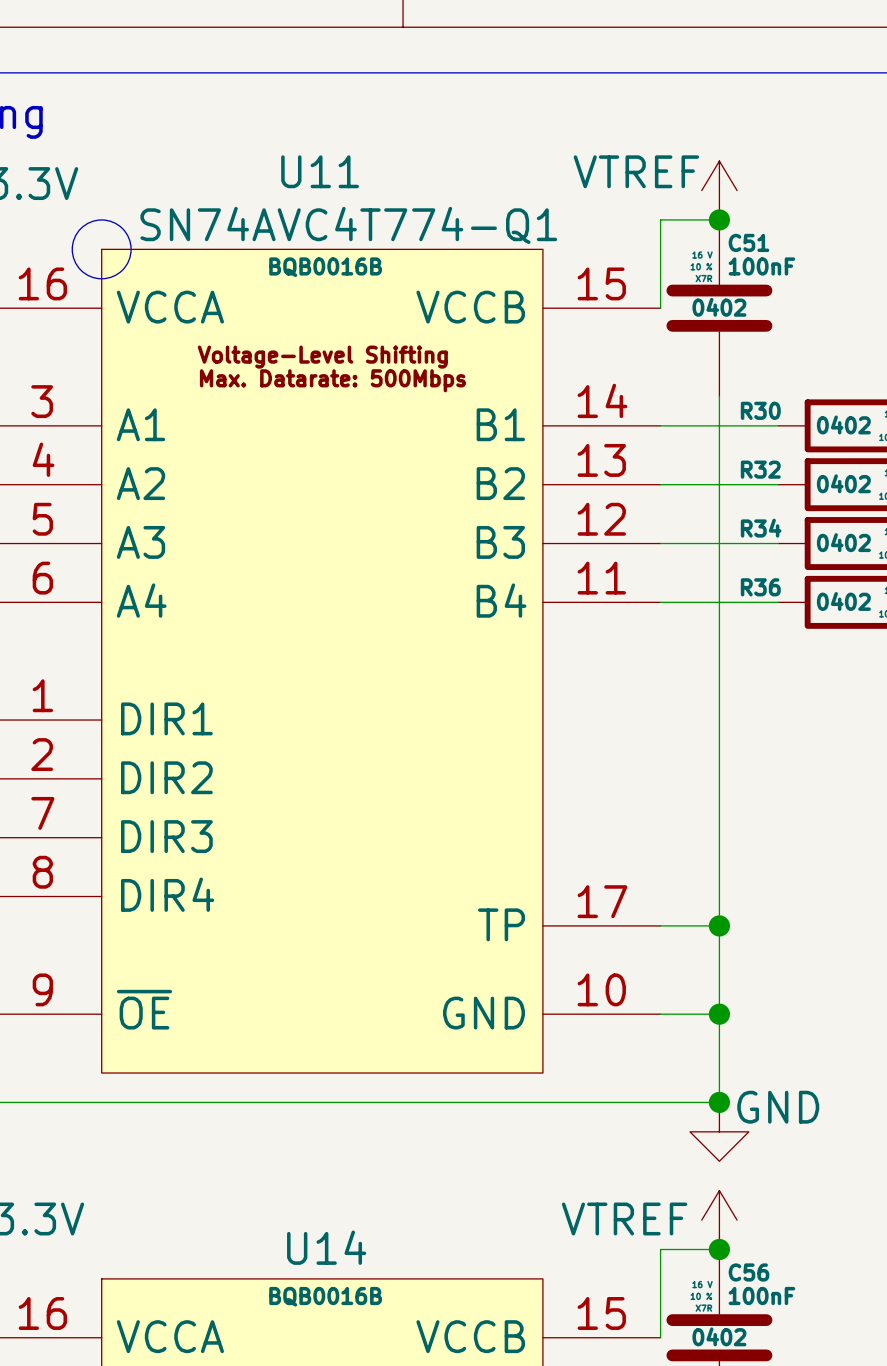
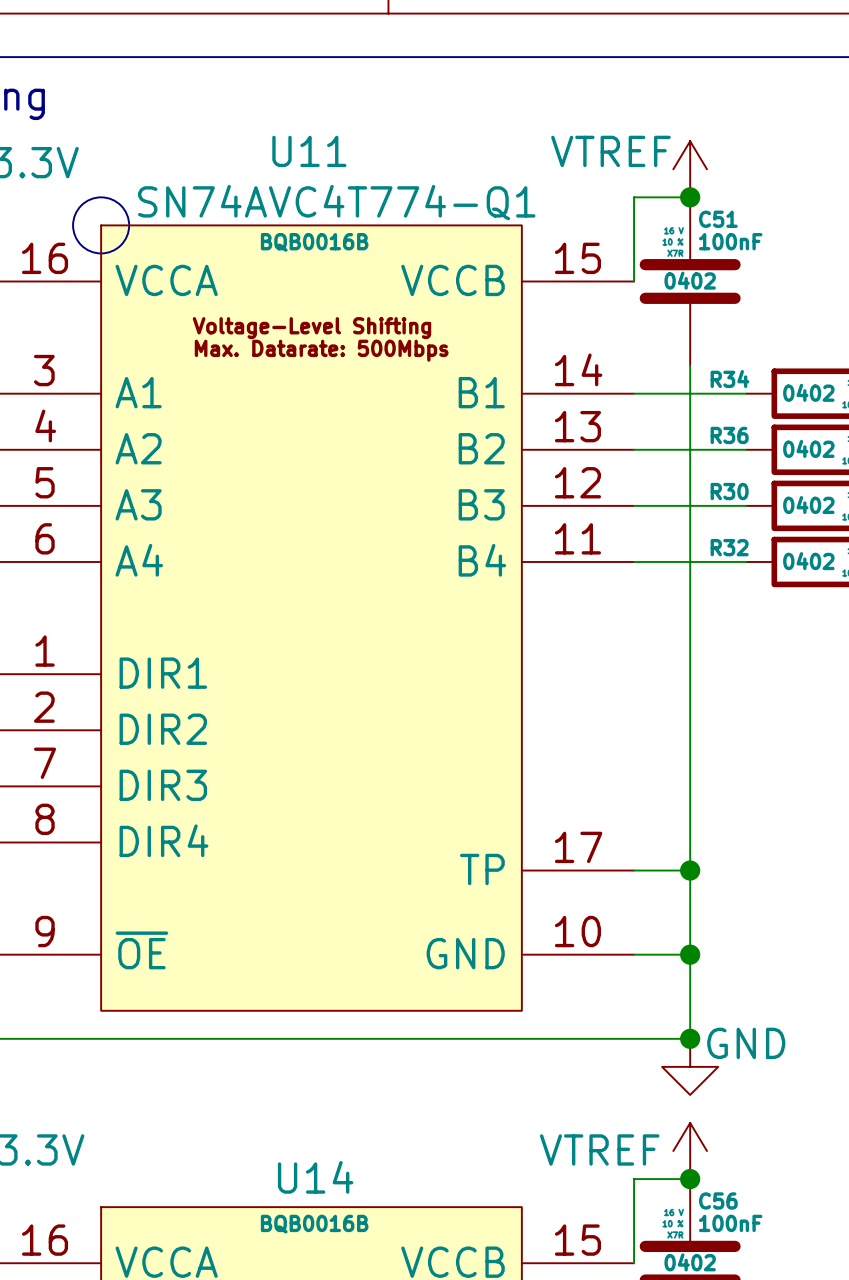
R30 name: R30 (760, 410) -> R34 (729, 379)
R32 name: R32 (760, 469) -> R36 (729, 435)
R34 name: R34 (761, 528) -> R30 (729, 491)
R36 name: R36 (760, 587) -> R32 (729, 547)

